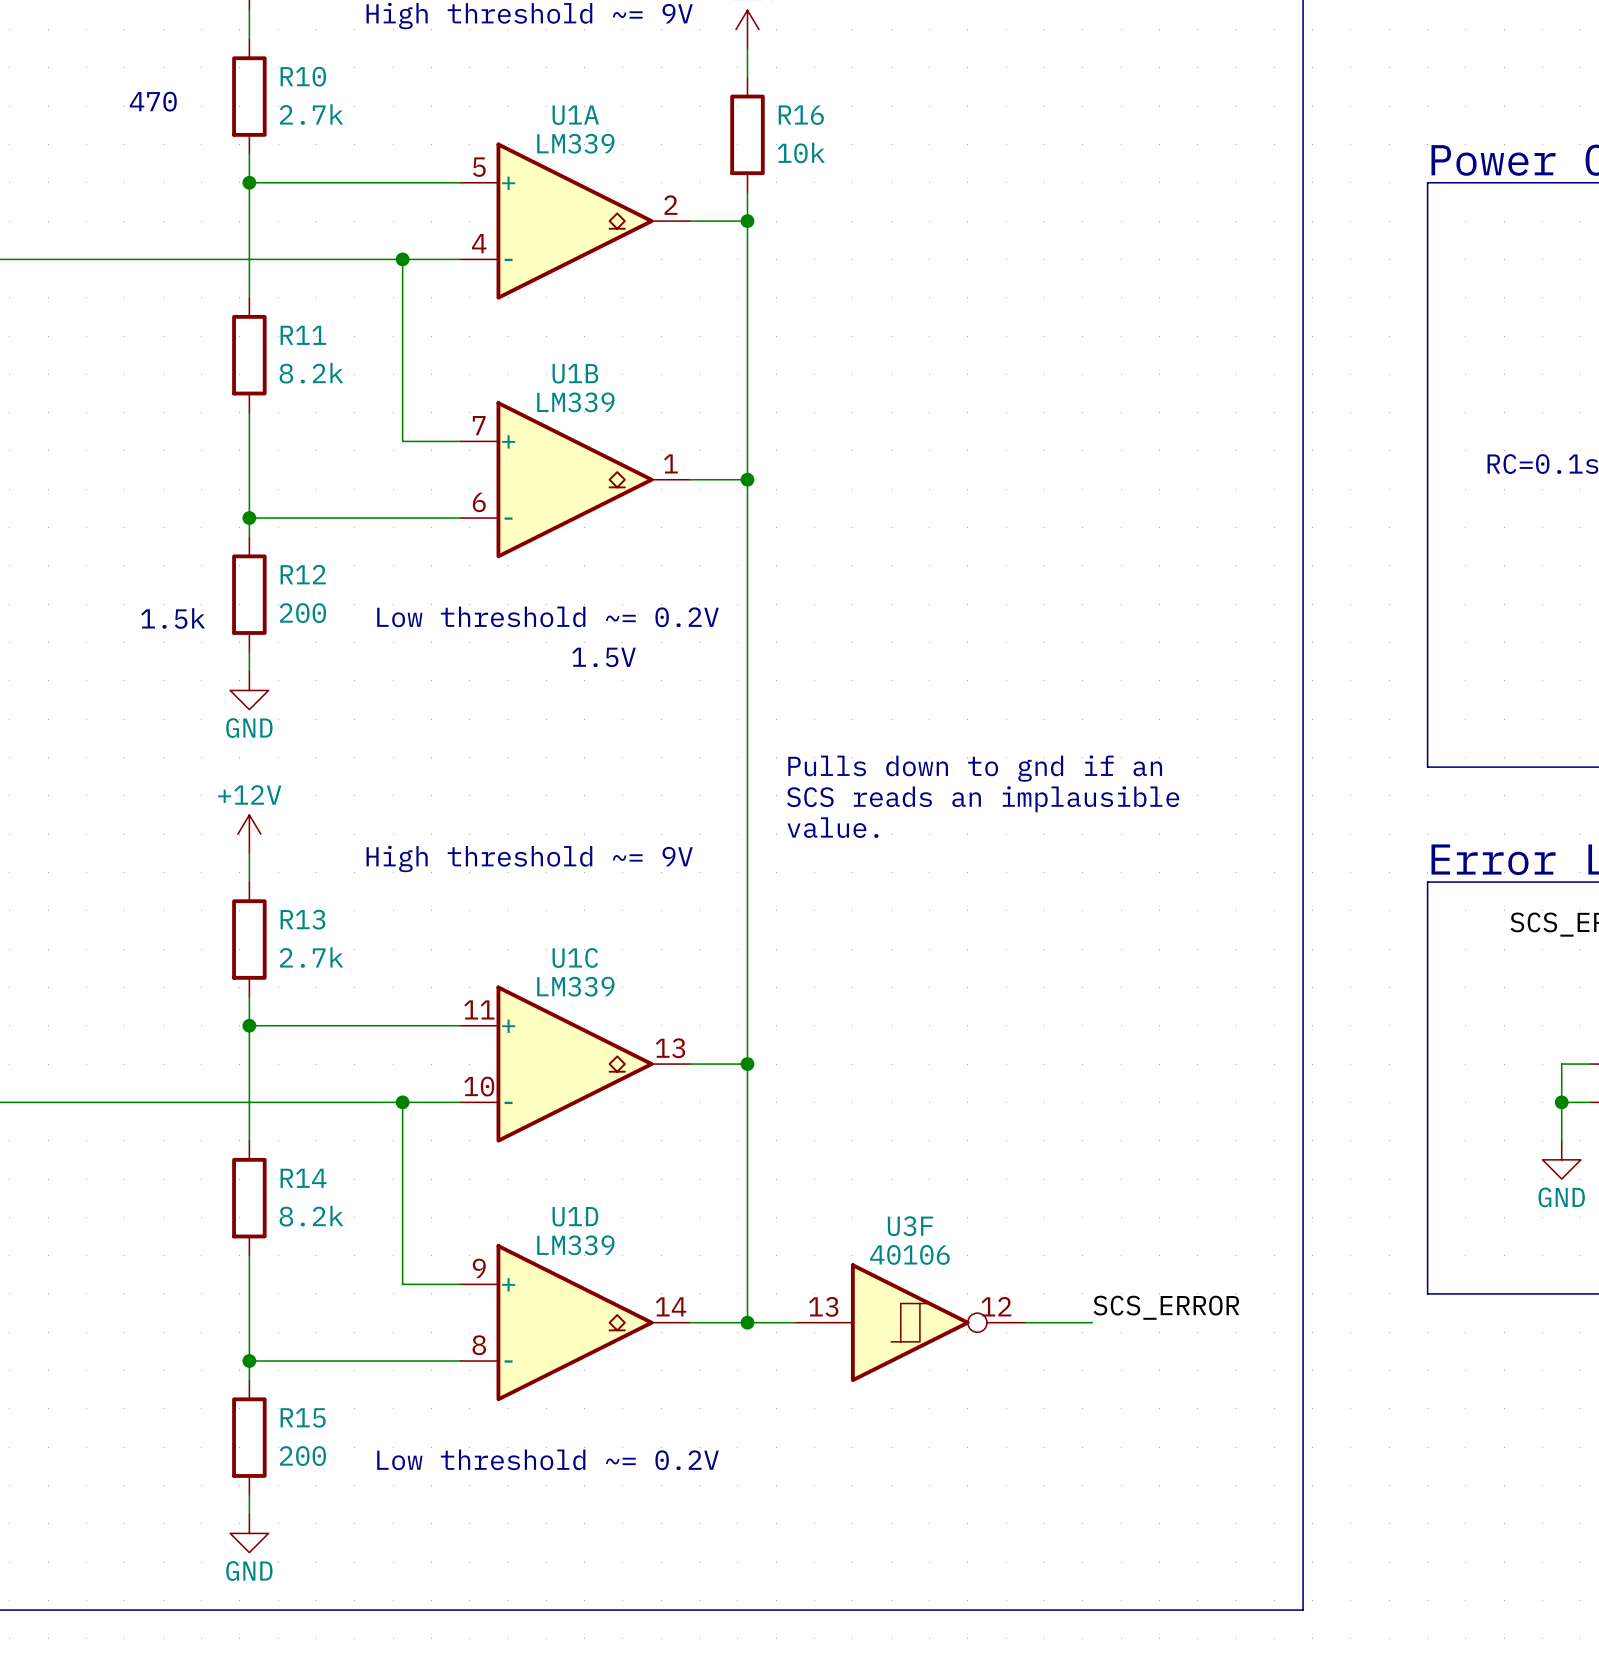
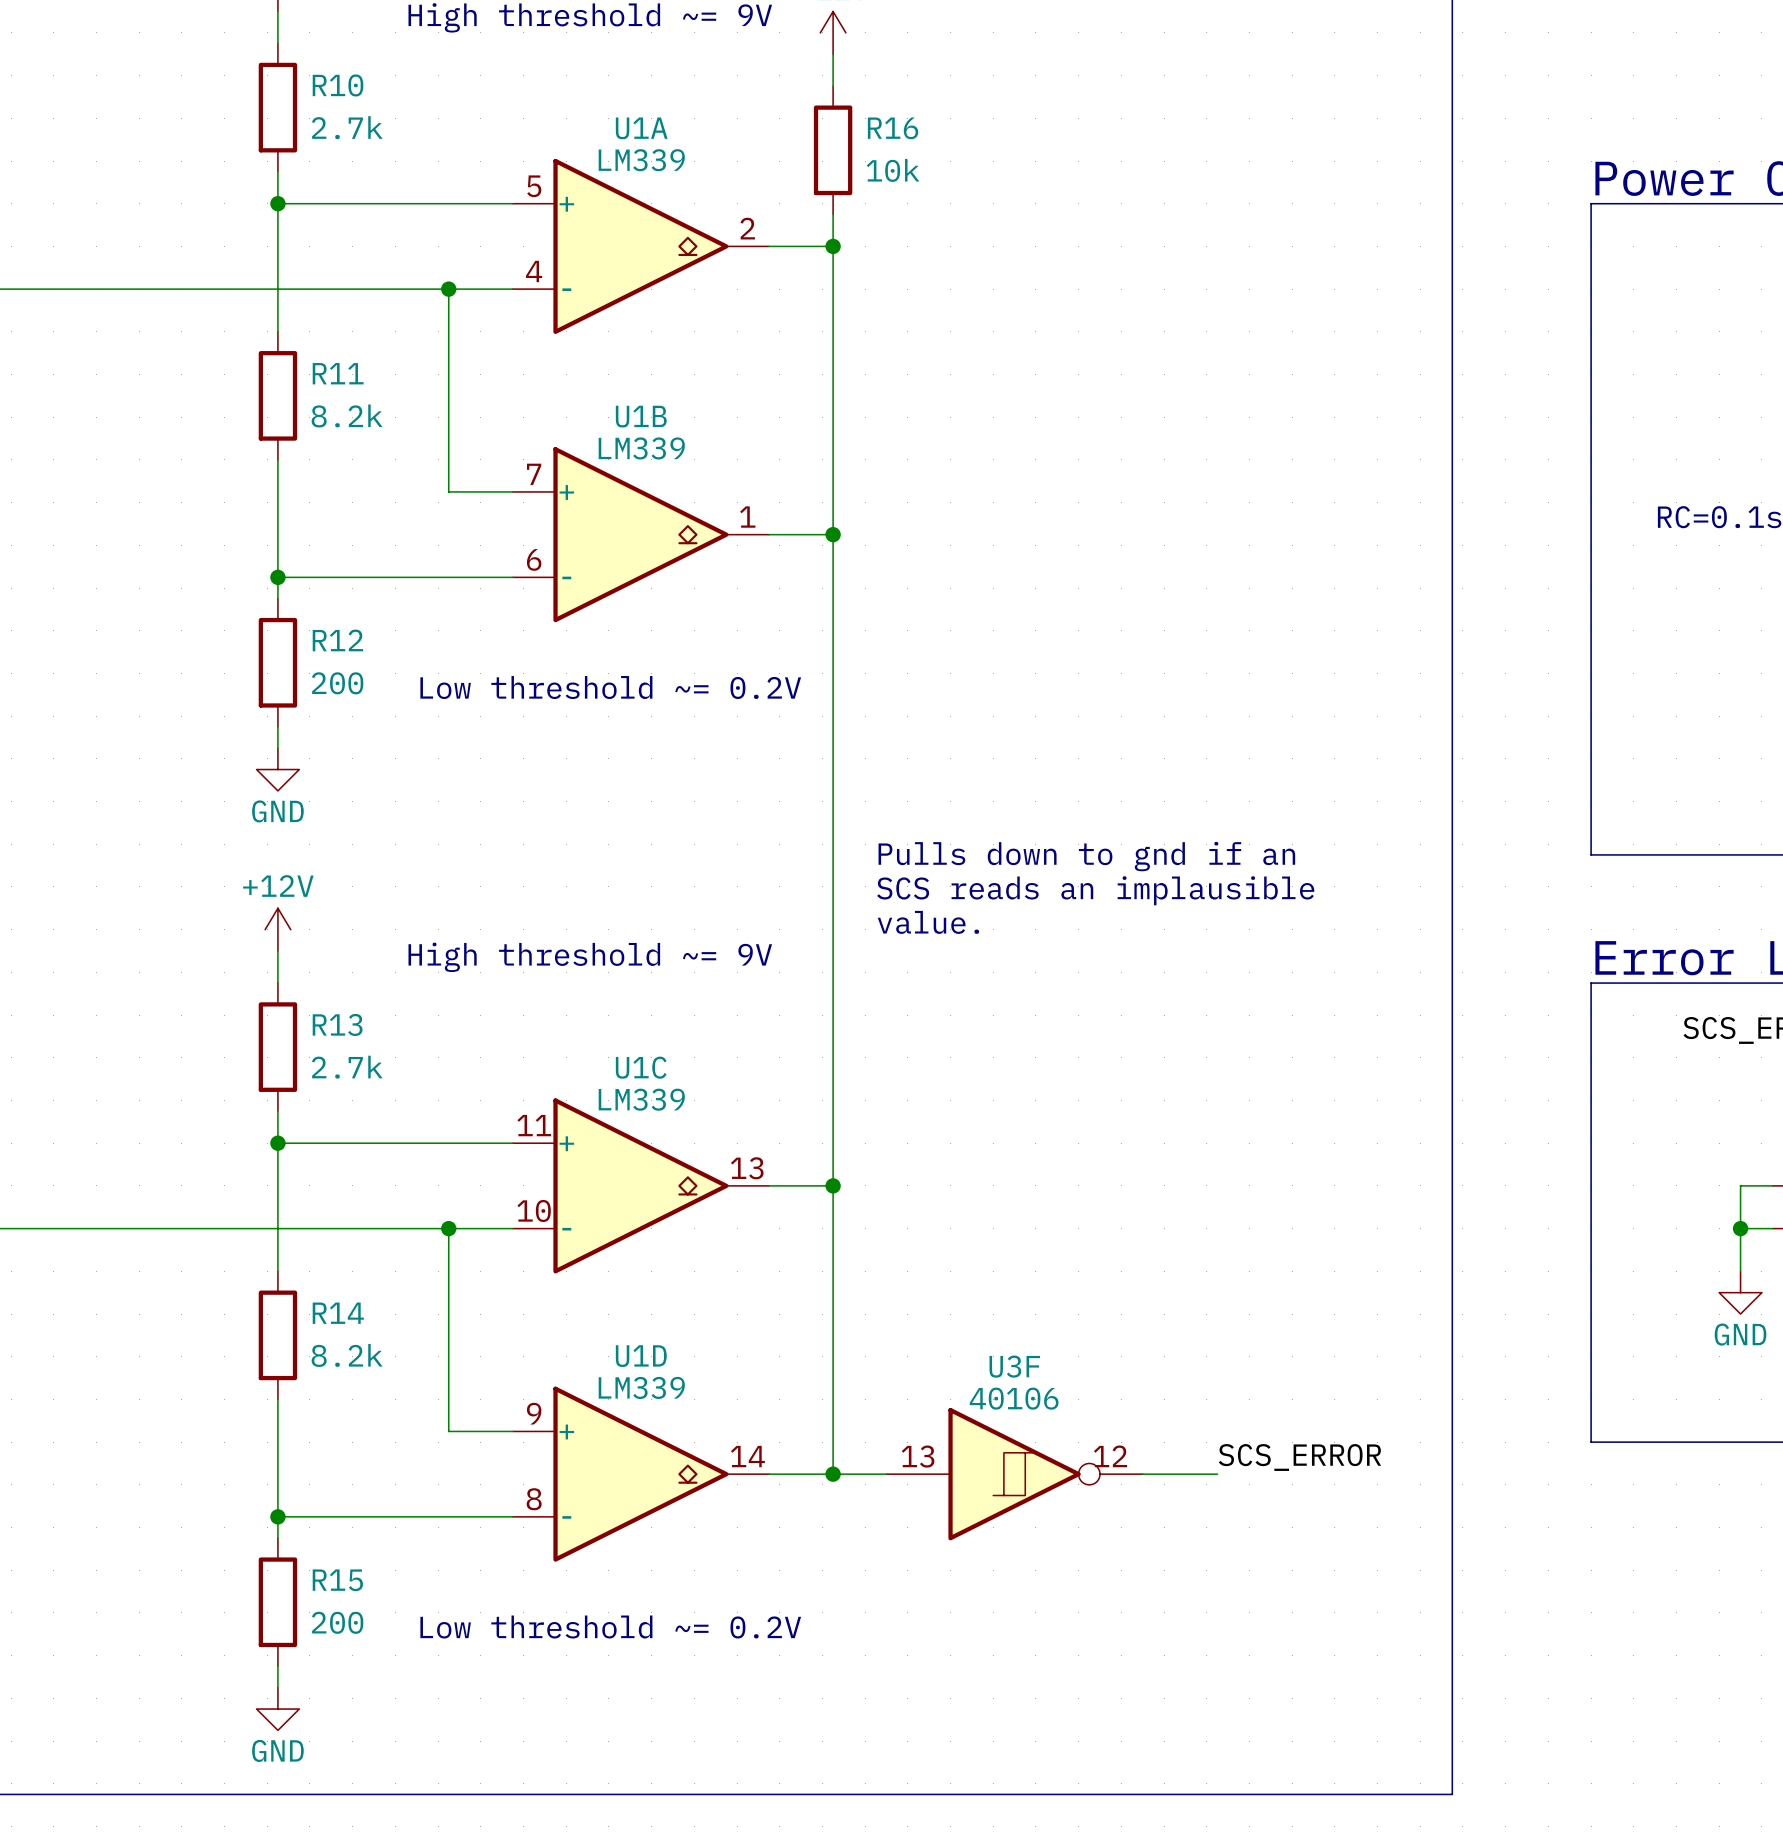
text: 470 (153, 101) -> none
text: 1.5k (173, 618) -> none
text: 1.5V (604, 657) -> none

